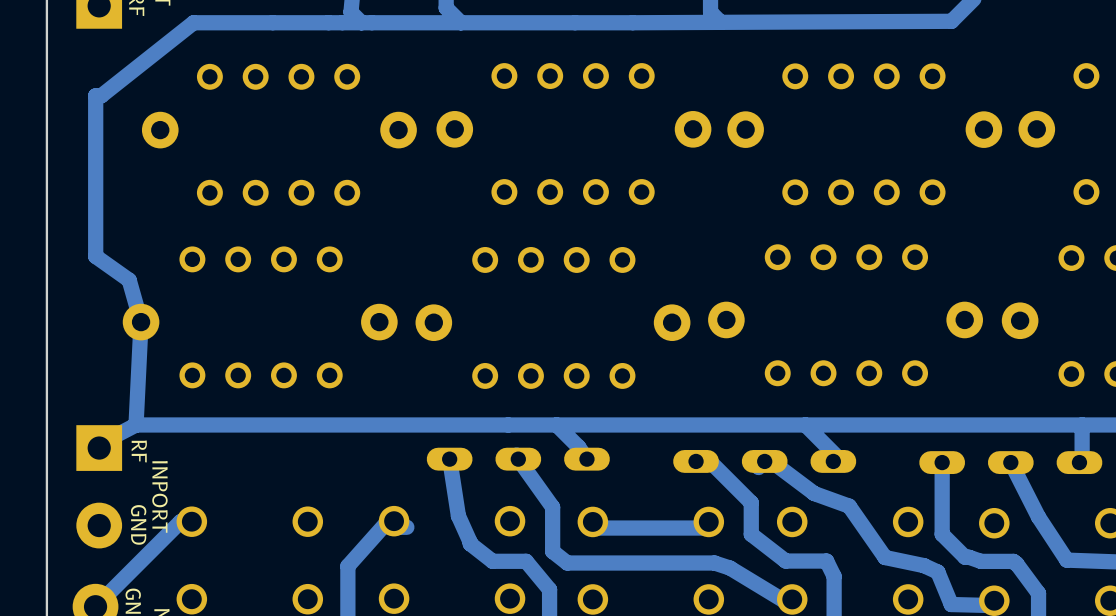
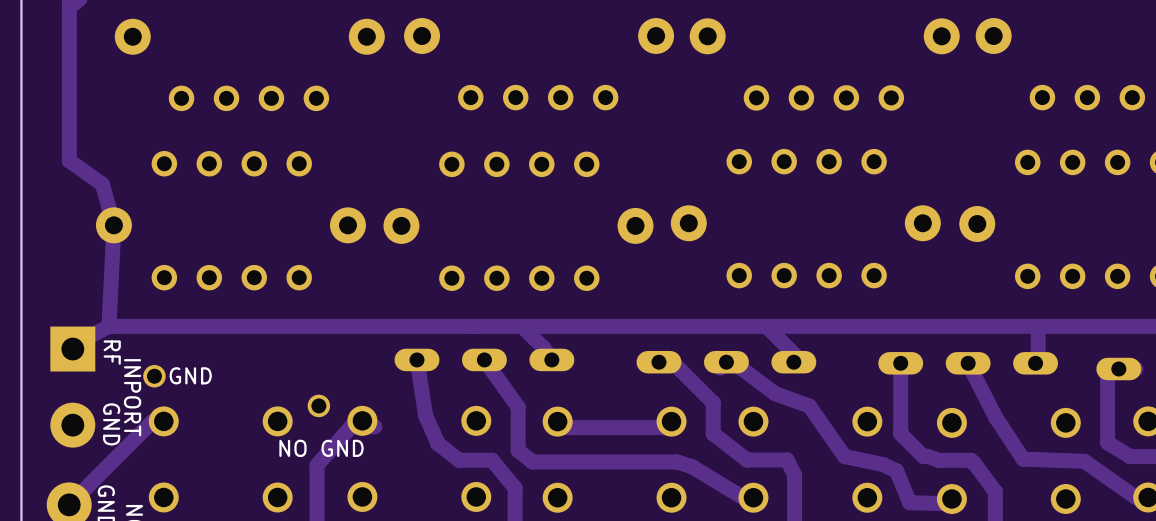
part: none -> (154, 376)
text: none -> GND (190, 375)
part: none -> (318, 405)
text: none -> NO GND (321, 448)

